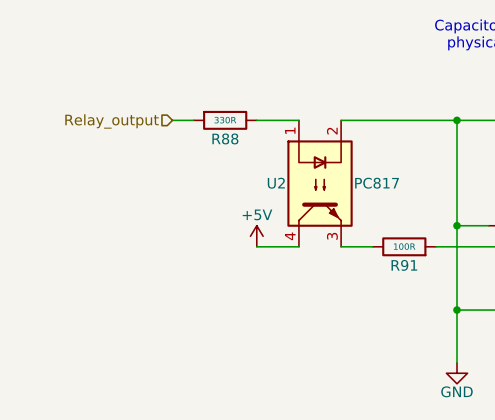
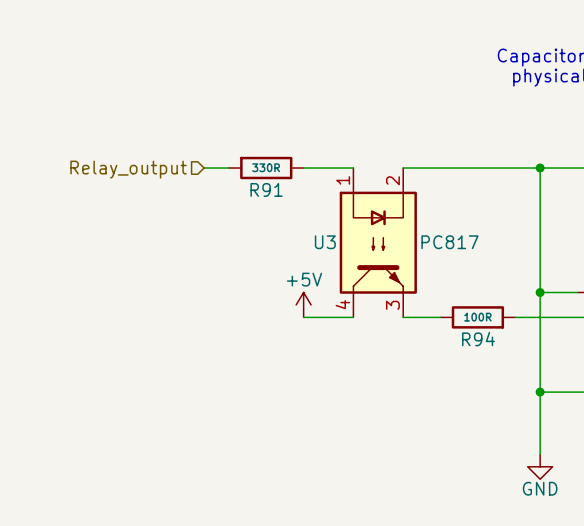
R88 name: R88 (225, 138) -> R91 (266, 189)
U2 name: U2 (276, 183) -> U3 (325, 242)
R91 name: R91 (404, 265) -> R94 (478, 339)

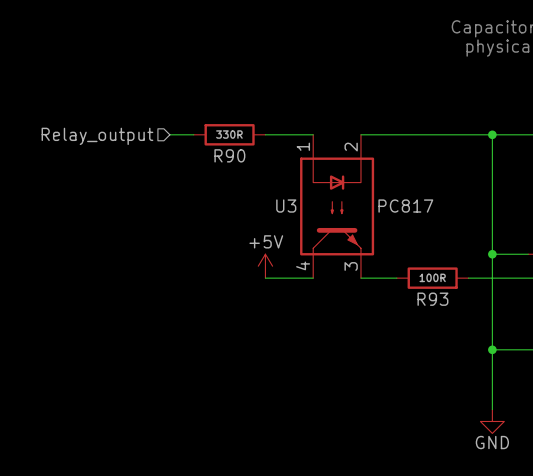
R91 name: R91 (266, 189) -> R90 (229, 155)
R94 name: R94 (478, 339) -> R93 (432, 299)

